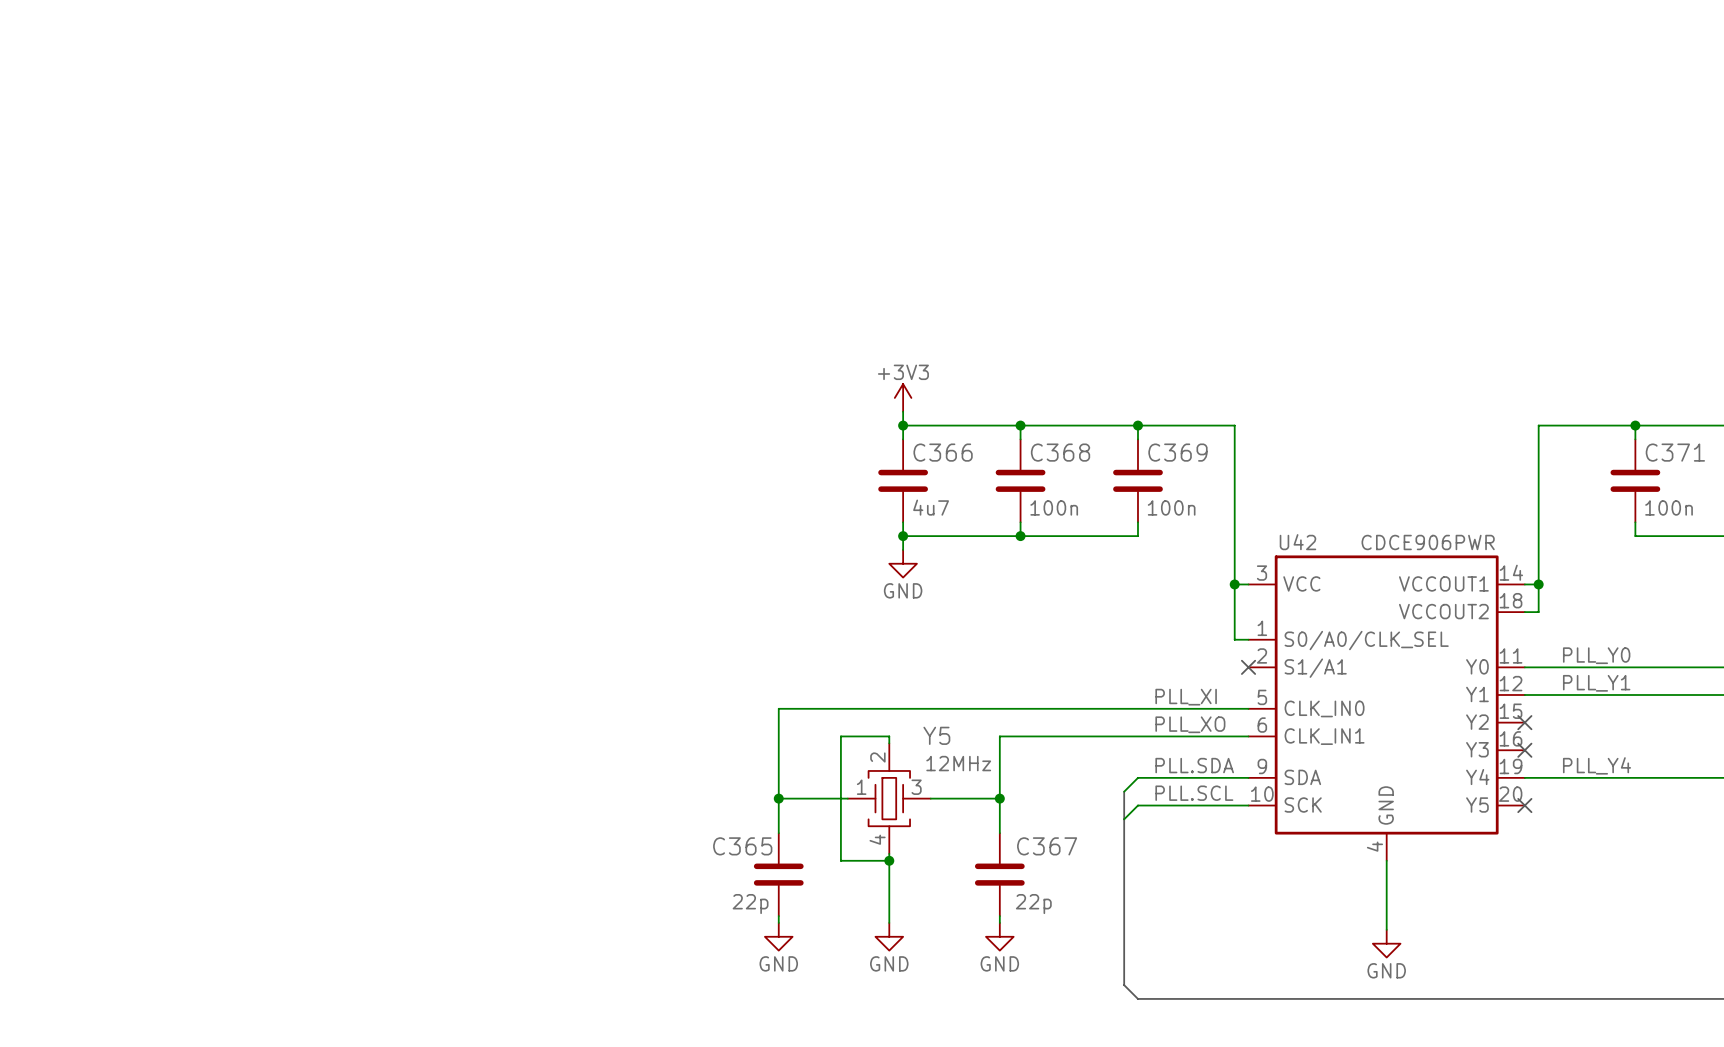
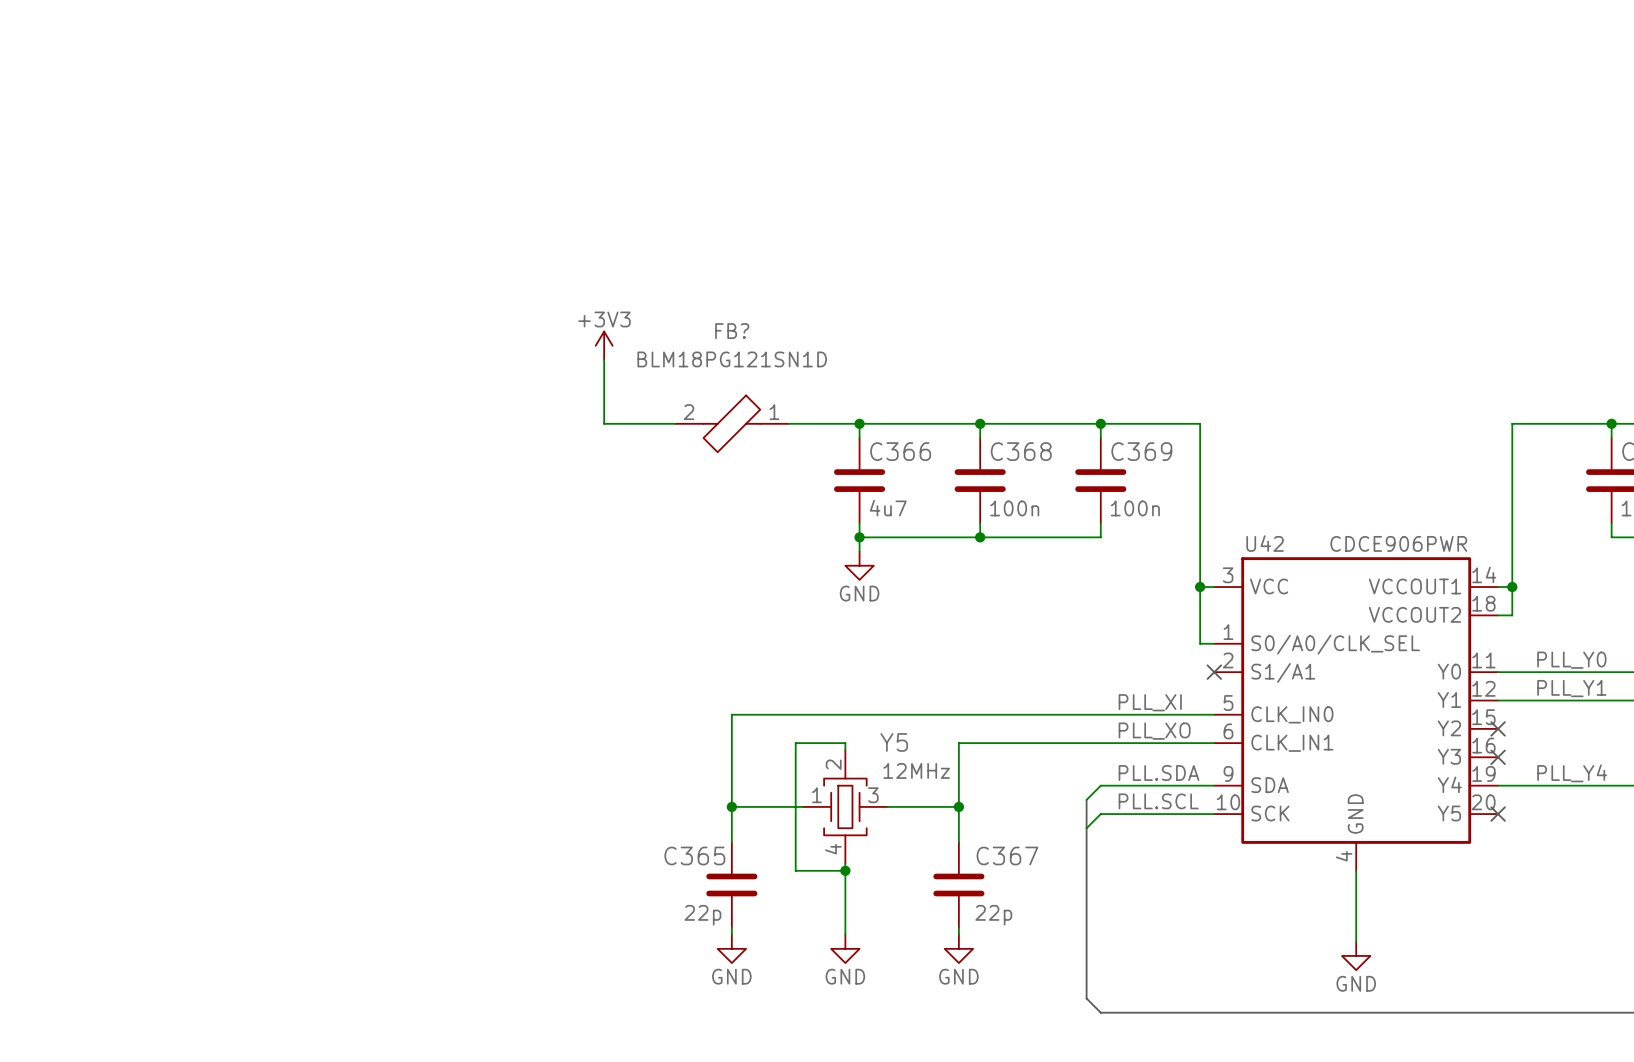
wire: none -> (604, 359) (604, 423) (675, 423)
power symbol position: +3V3 (903, 397) -> +3V3 (604, 345)
wire: (903, 411) (903, 425) -> (788, 423) (859, 423)
FB?: none -> BLM18PG121SN1D (731, 423)

